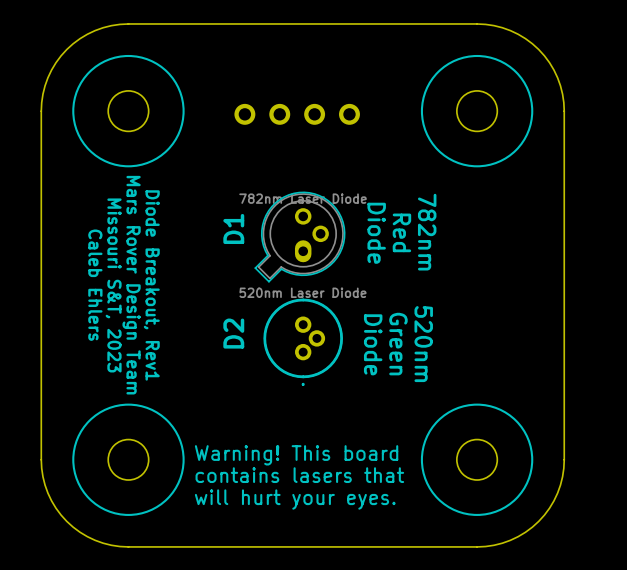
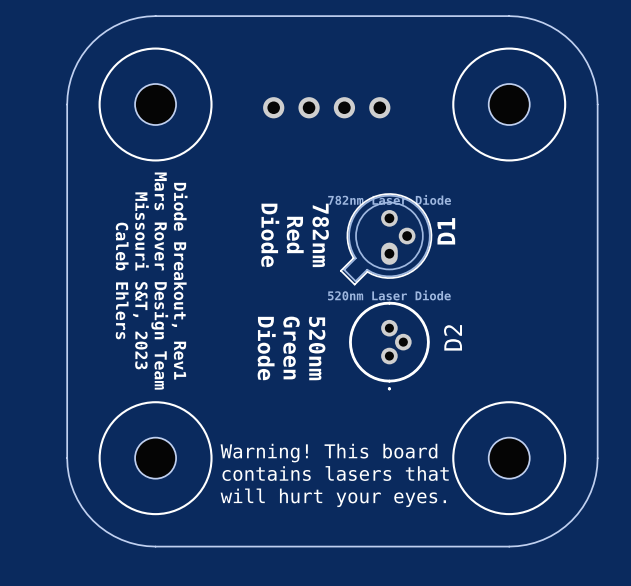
D1 name position: D1 (233, 228) -> D1 (446, 231)
text position: Red (401, 232) -> Red (295, 234)
text position: 782nm (427, 232) -> 782nm (320, 235)
text: Diode (376, 233) -> none
D1 position: (300, 237) -> (386, 239)
text: none -> Diode (270, 235)
D2 name position: D2 (233, 333) -> D2 (452, 337)
D2 position: (303, 342) -> (389, 345)
text: Diode (373, 344) -> none
text position: Green (398, 344) -> Green (291, 348)
text position: 520nm (423, 344) -> 520nm (317, 348)
text: none -> Diode (266, 348)

